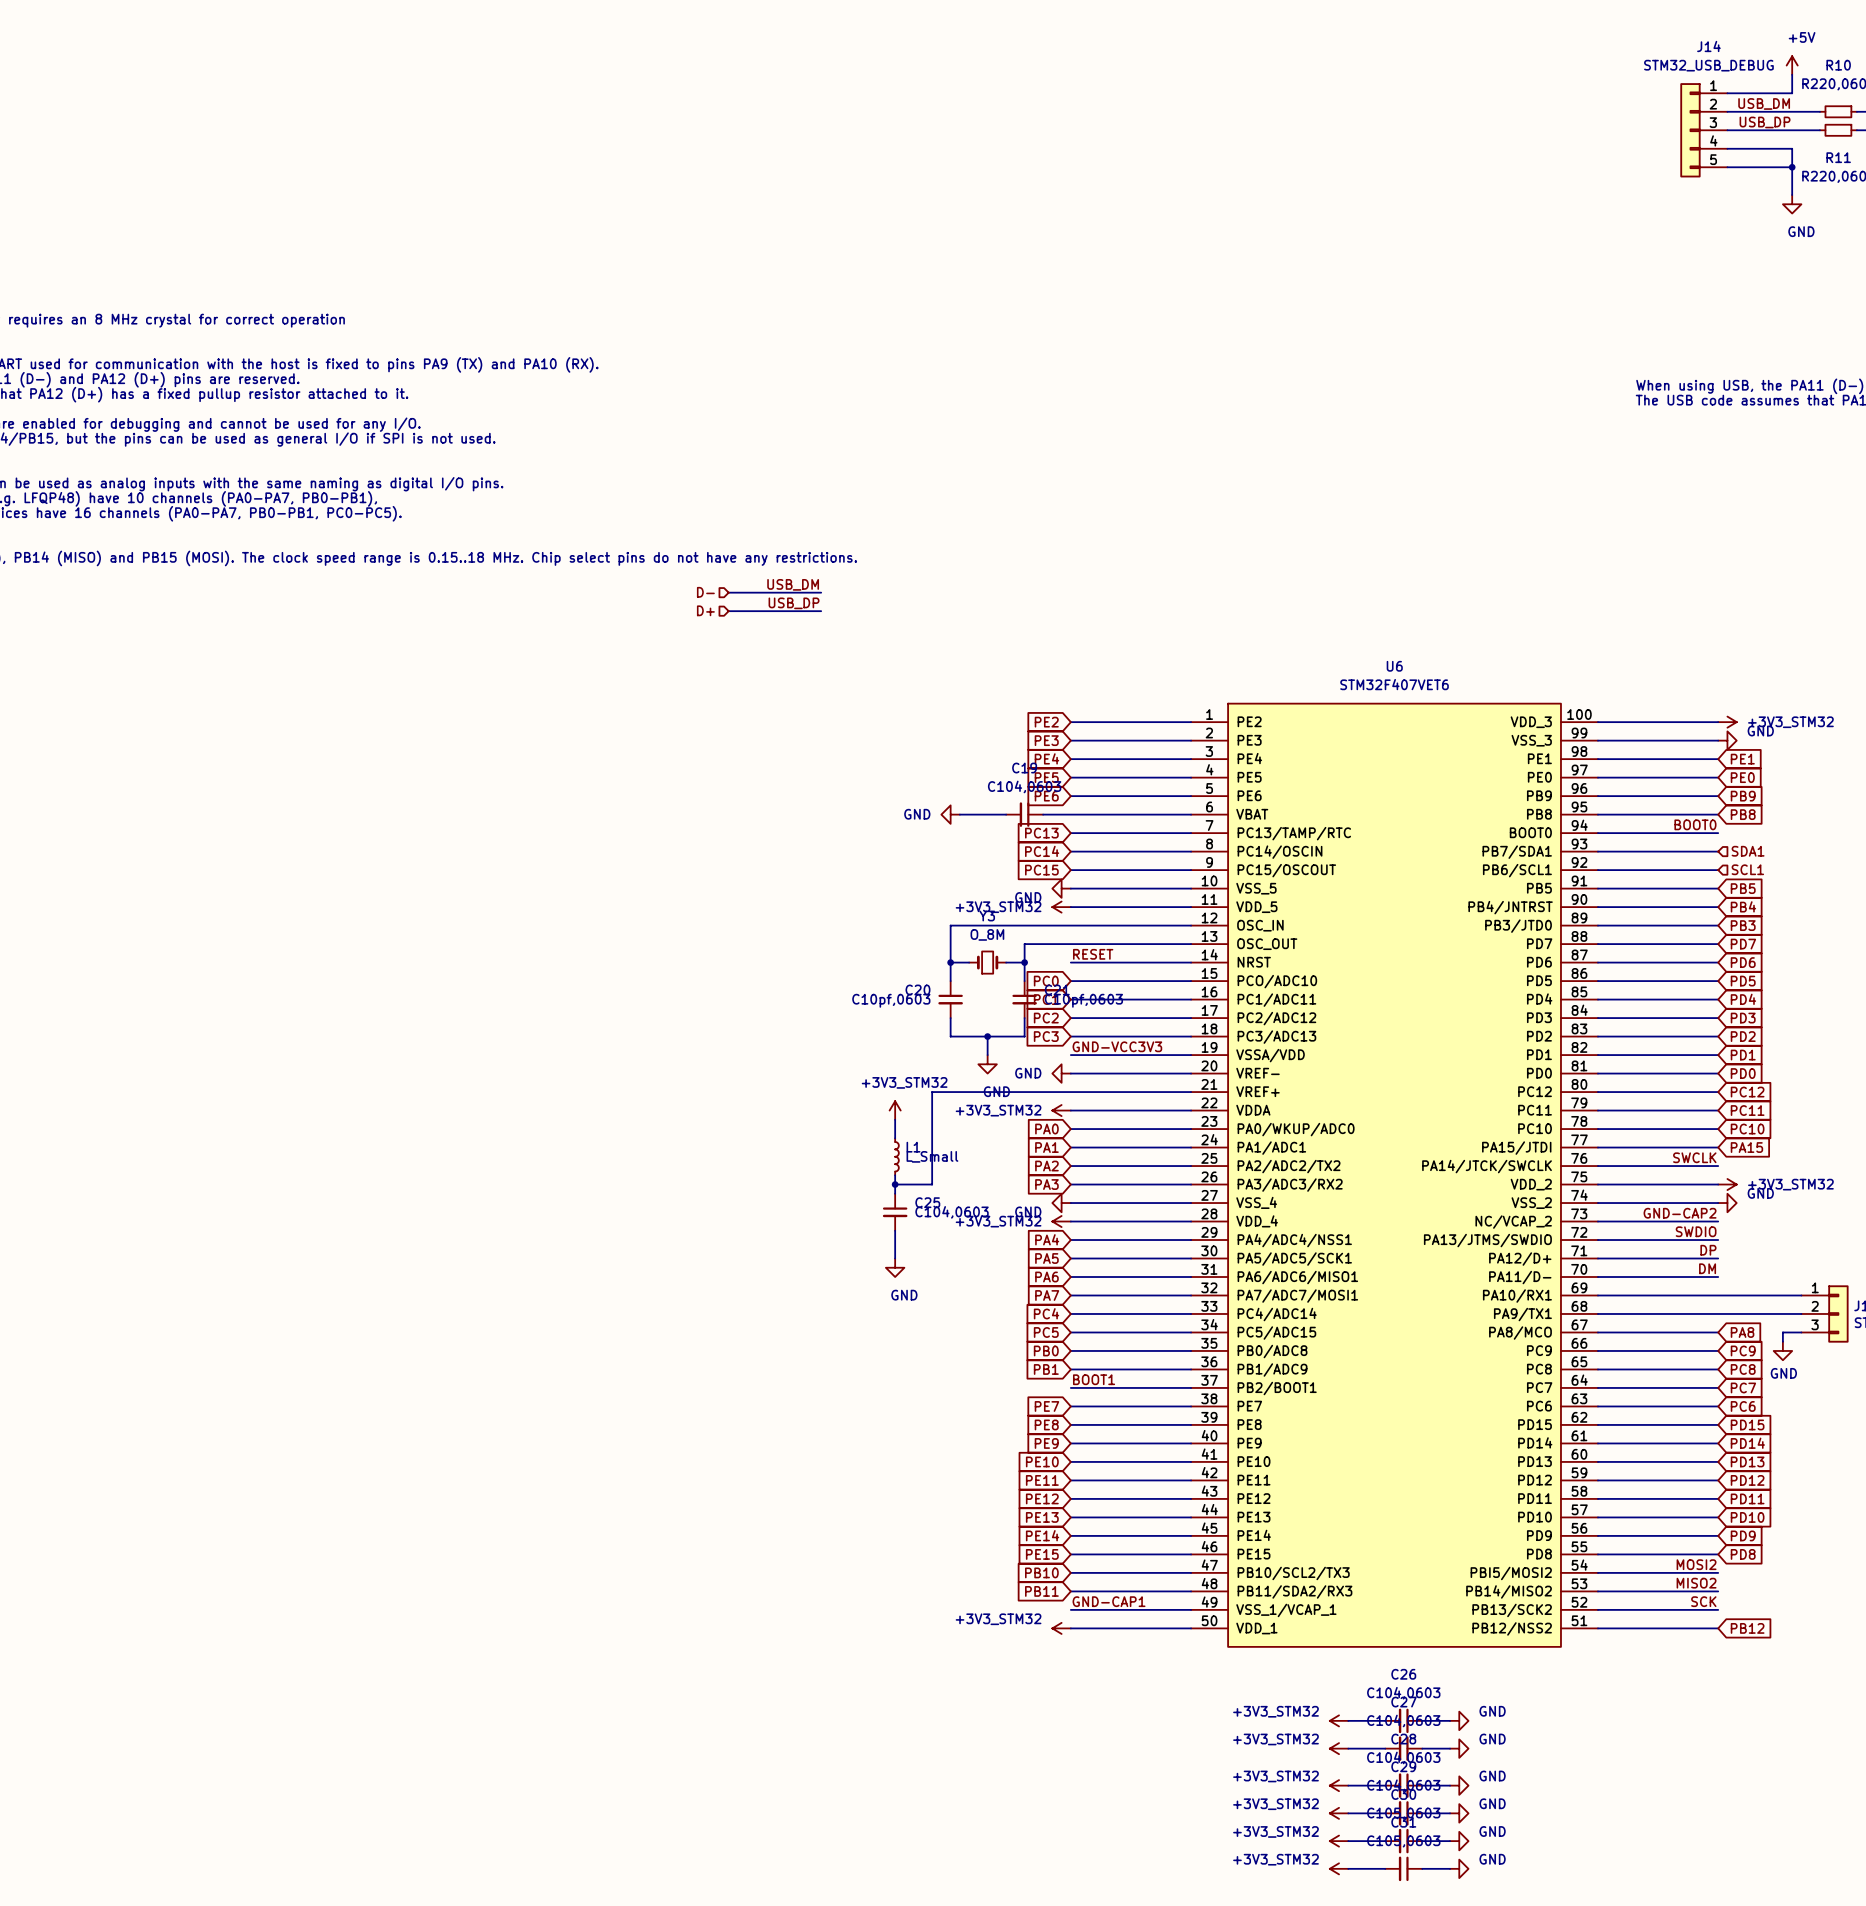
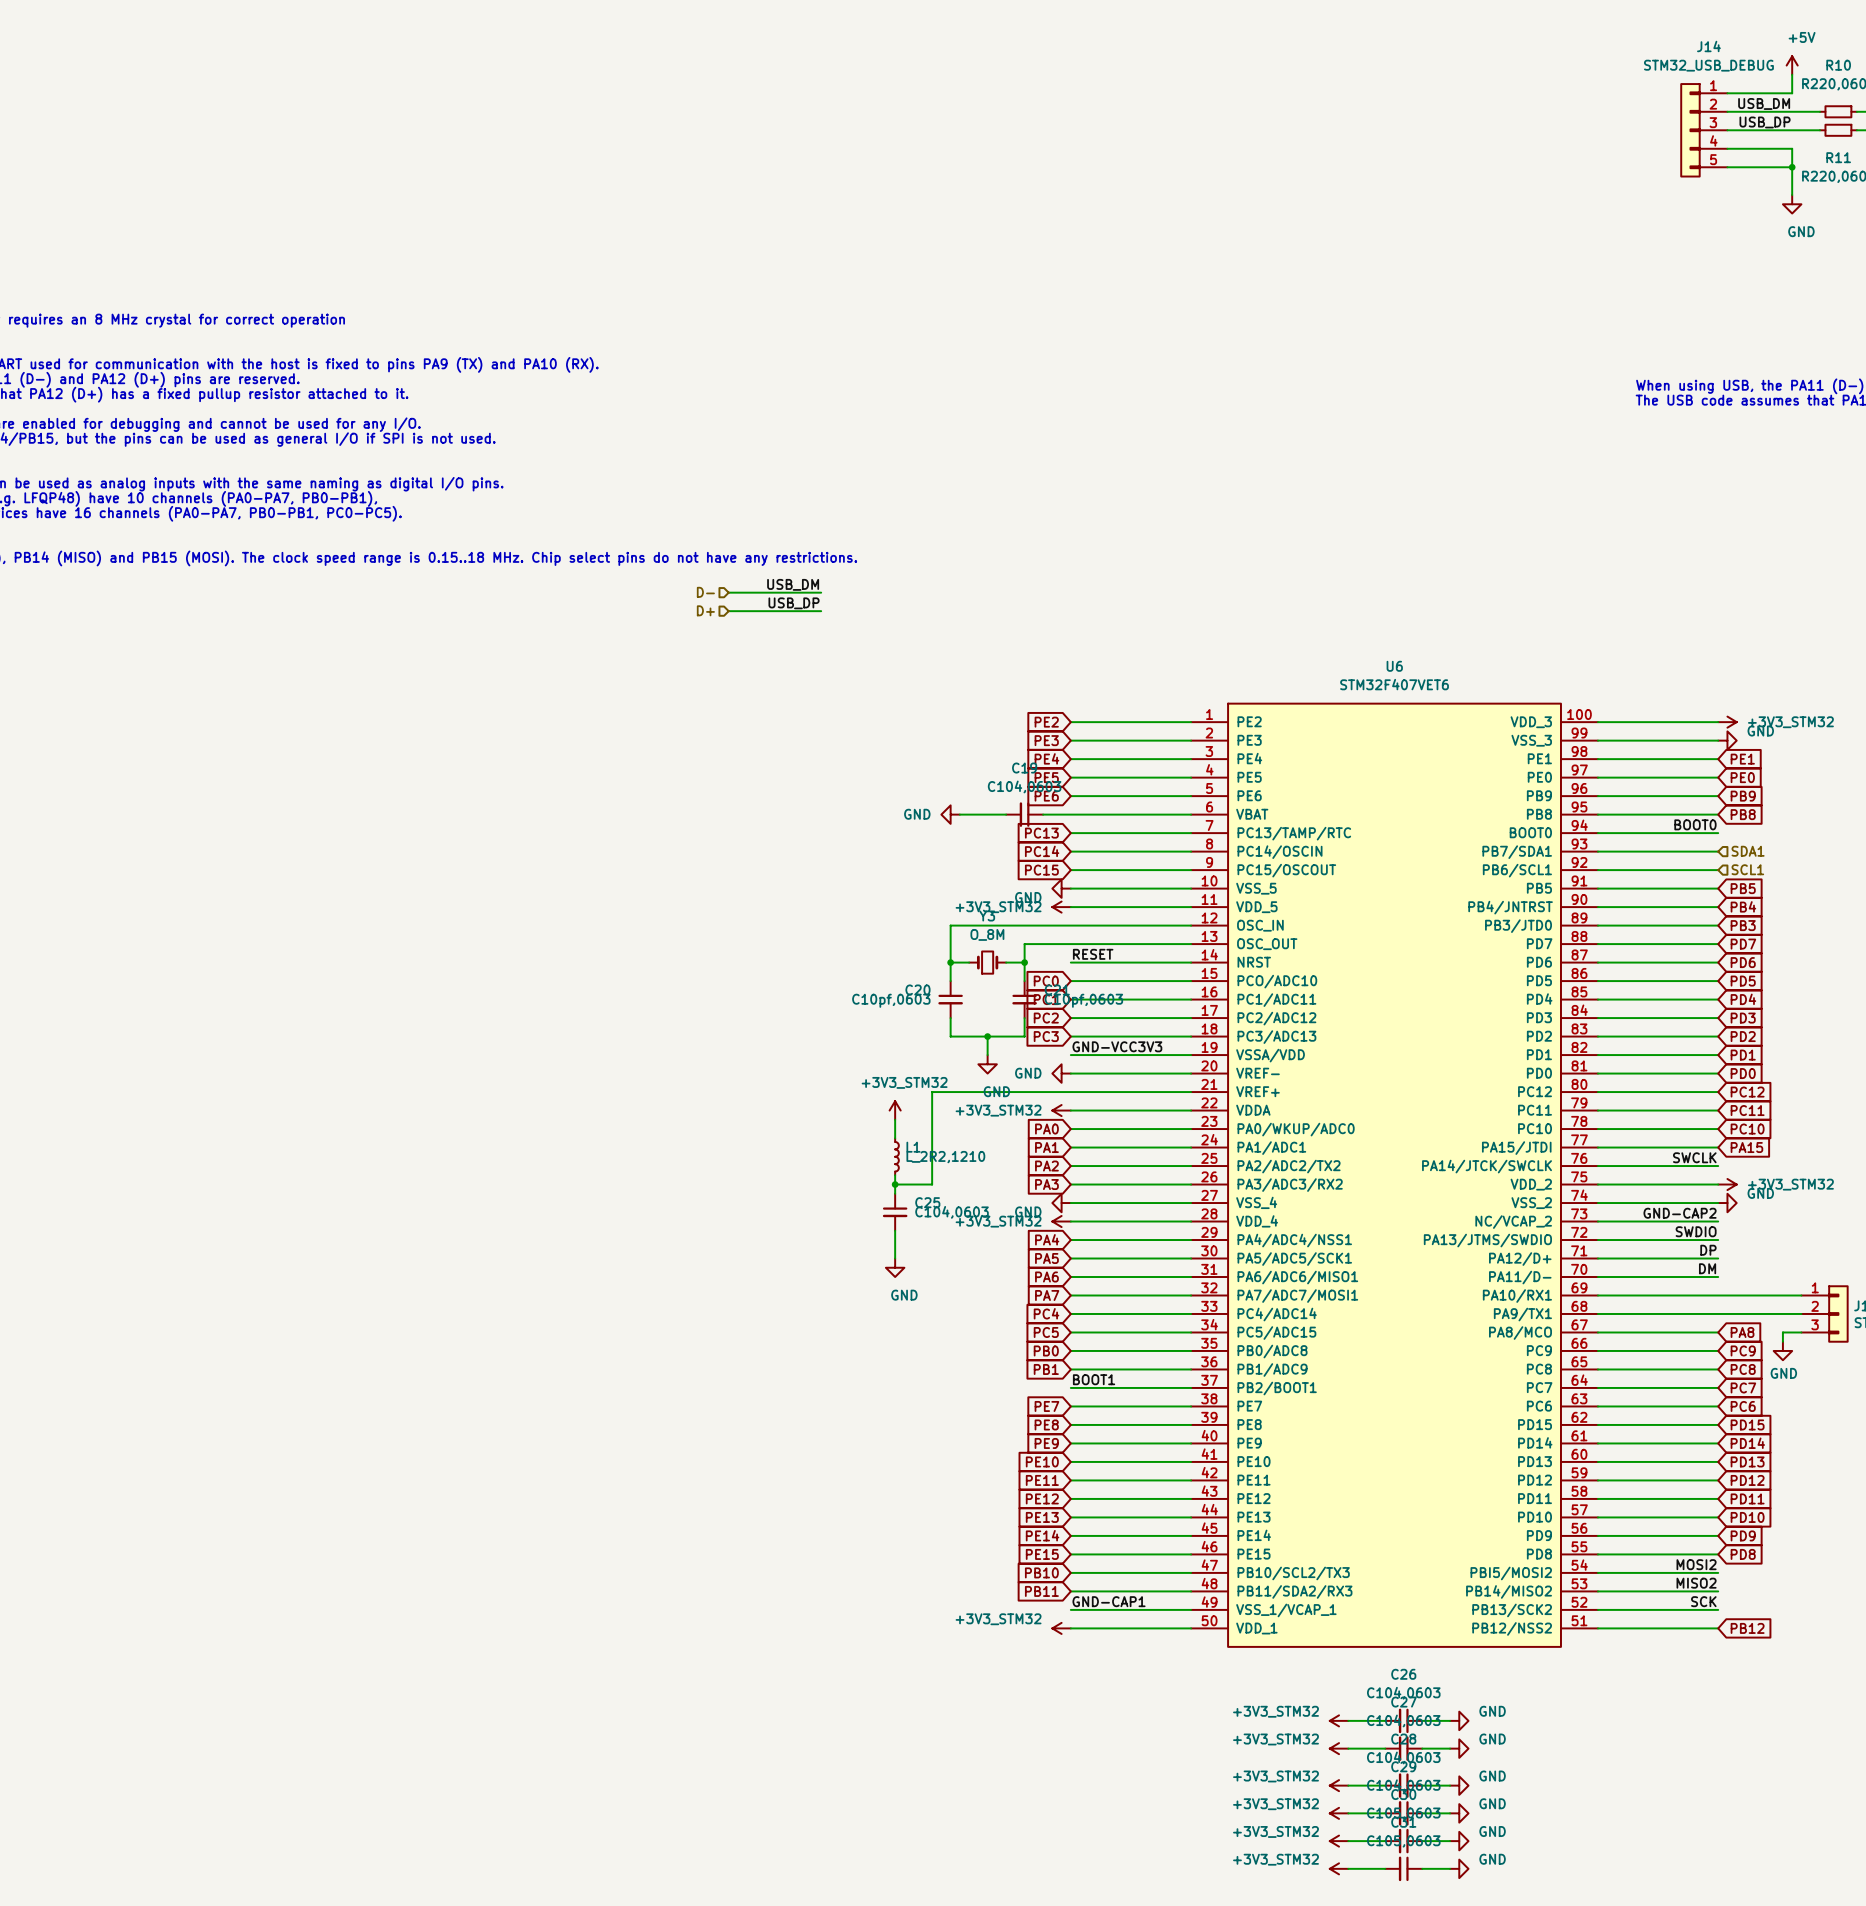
L1 value: L_Small (932, 1156) -> L_2R2,1210 (945, 1157)

